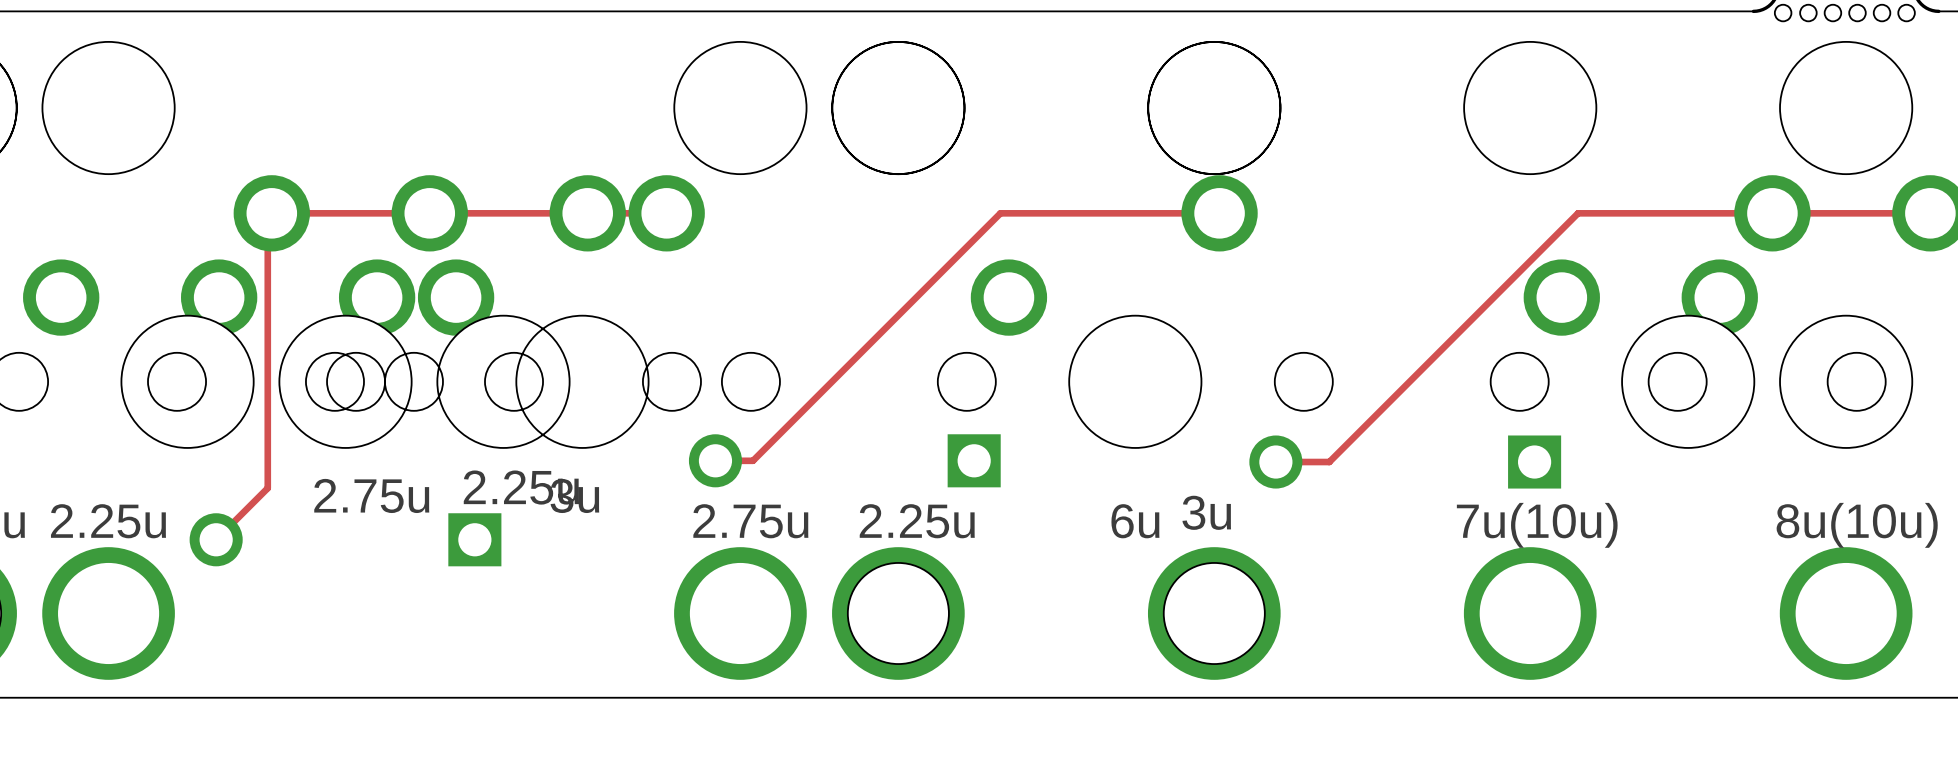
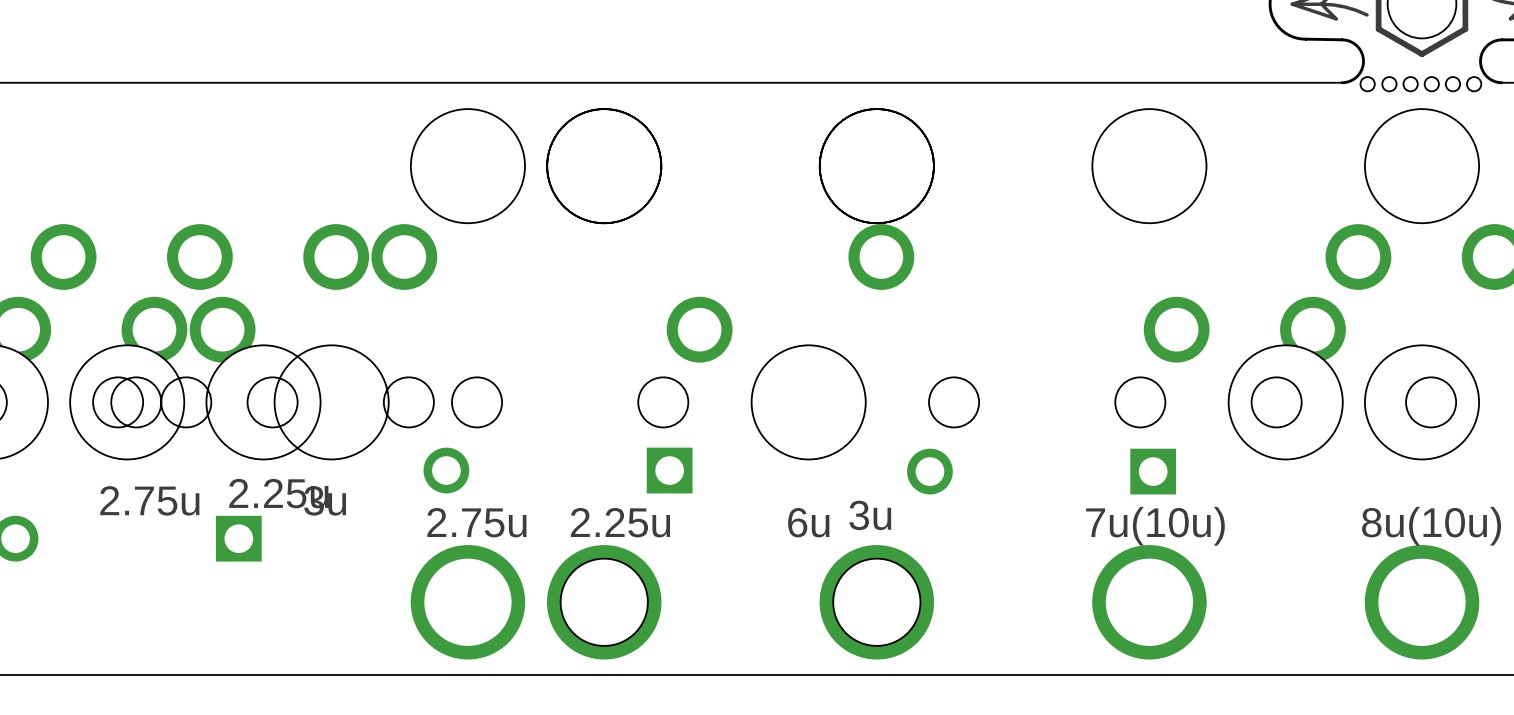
track: (666, 213) (271, 213) (267, 217) (267, 488) (216, 539) -> none
track: (1219, 213) (1000, 213) (752, 460) (715, 460) -> none
track: (1930, 213) (1578, 213) (1329, 462) (1275, 462) -> none

